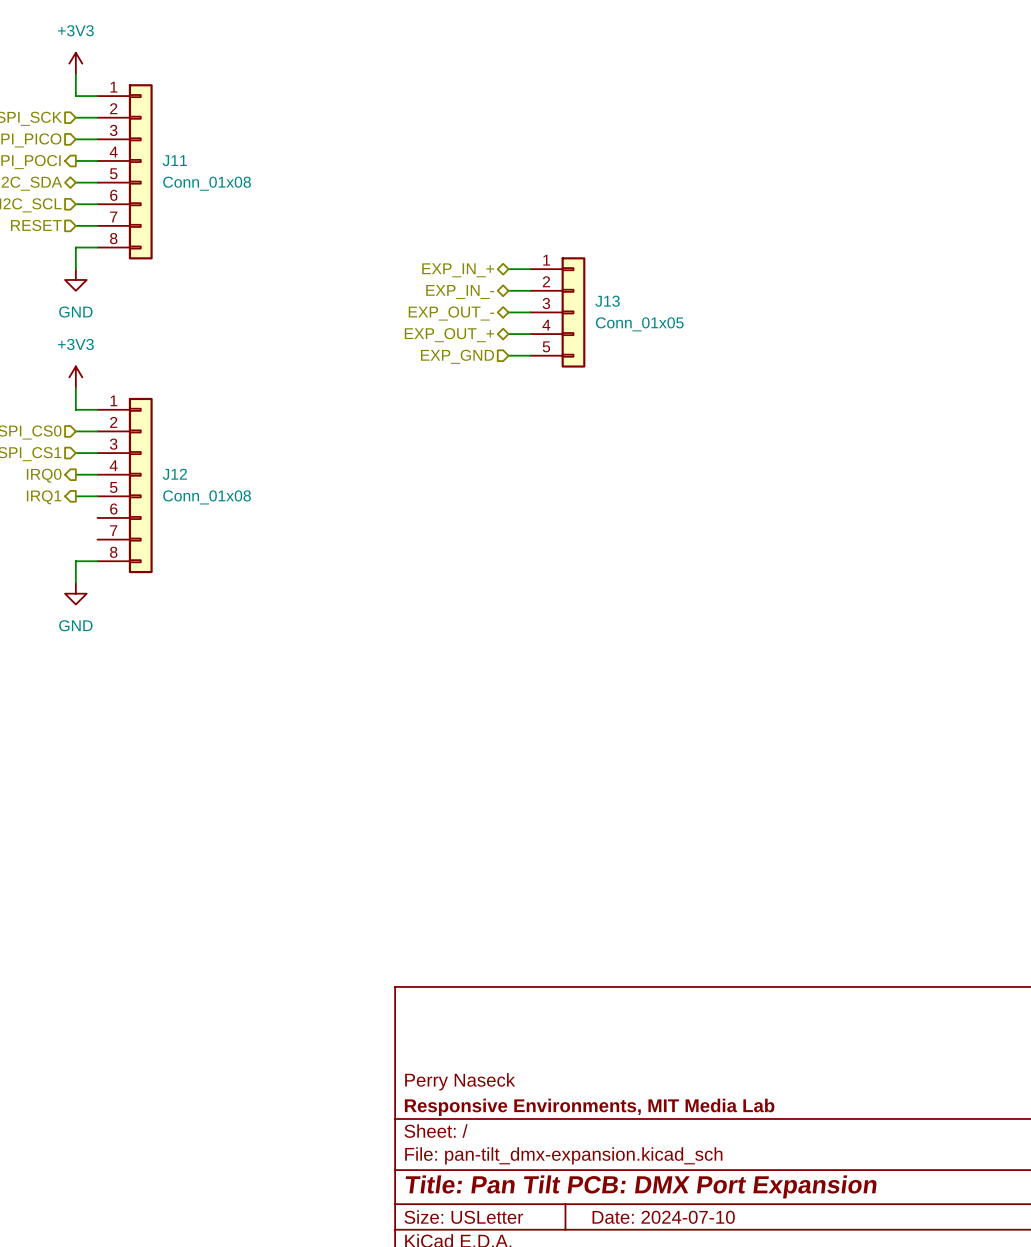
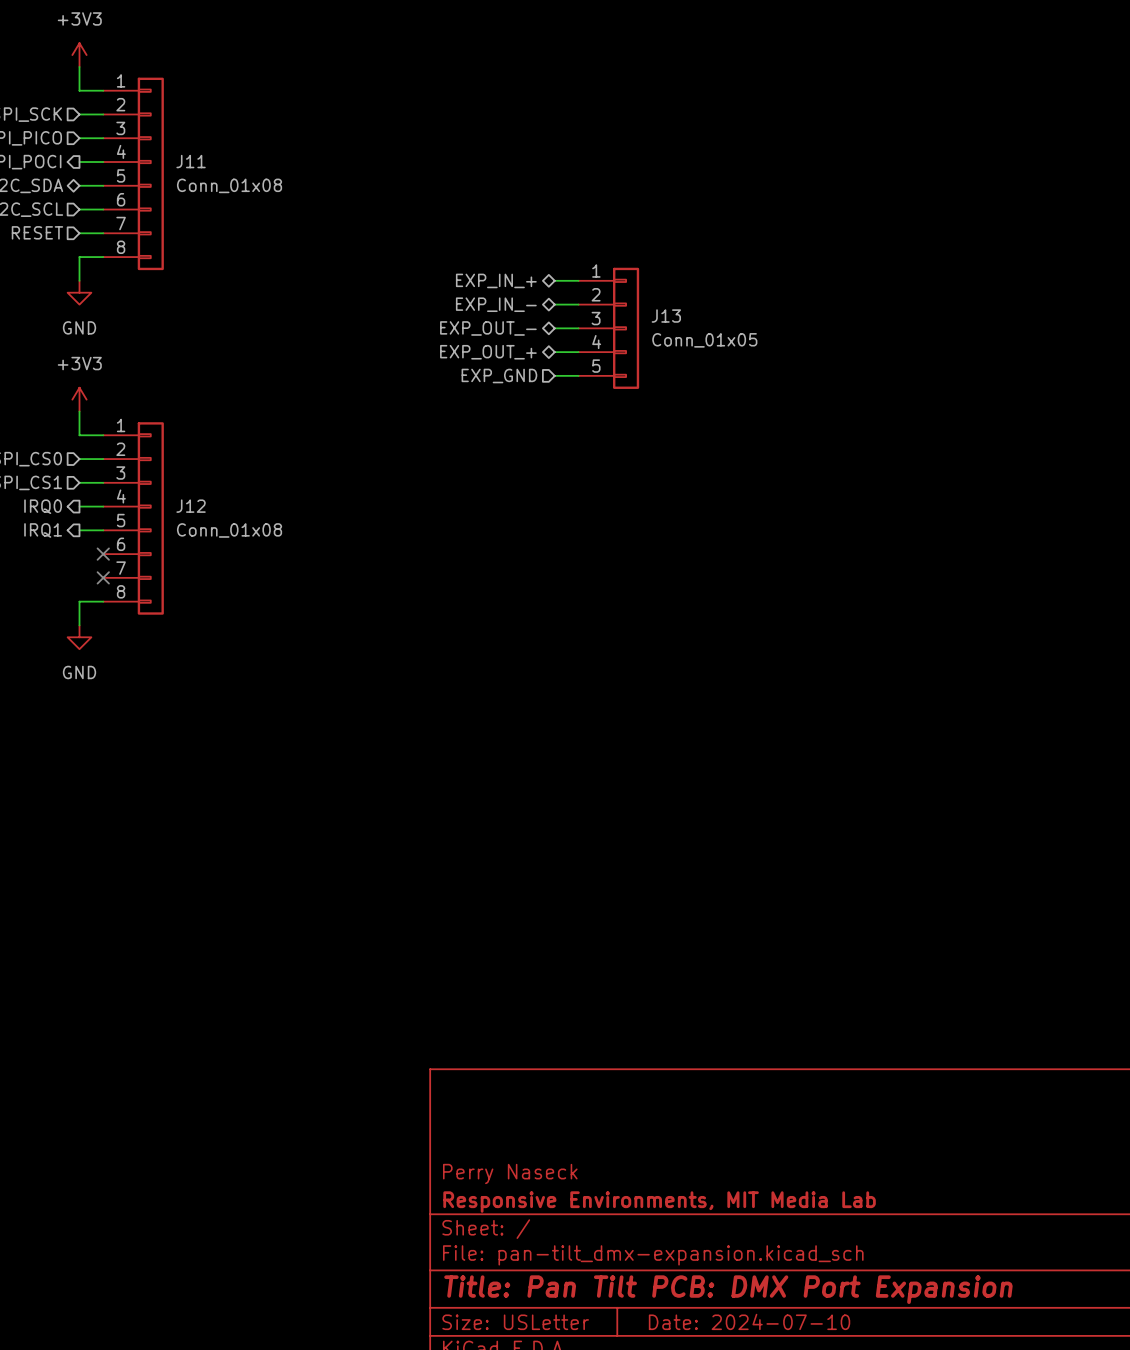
no-connect mark: none -> (103, 554)
no-connect mark: none -> (103, 577)

